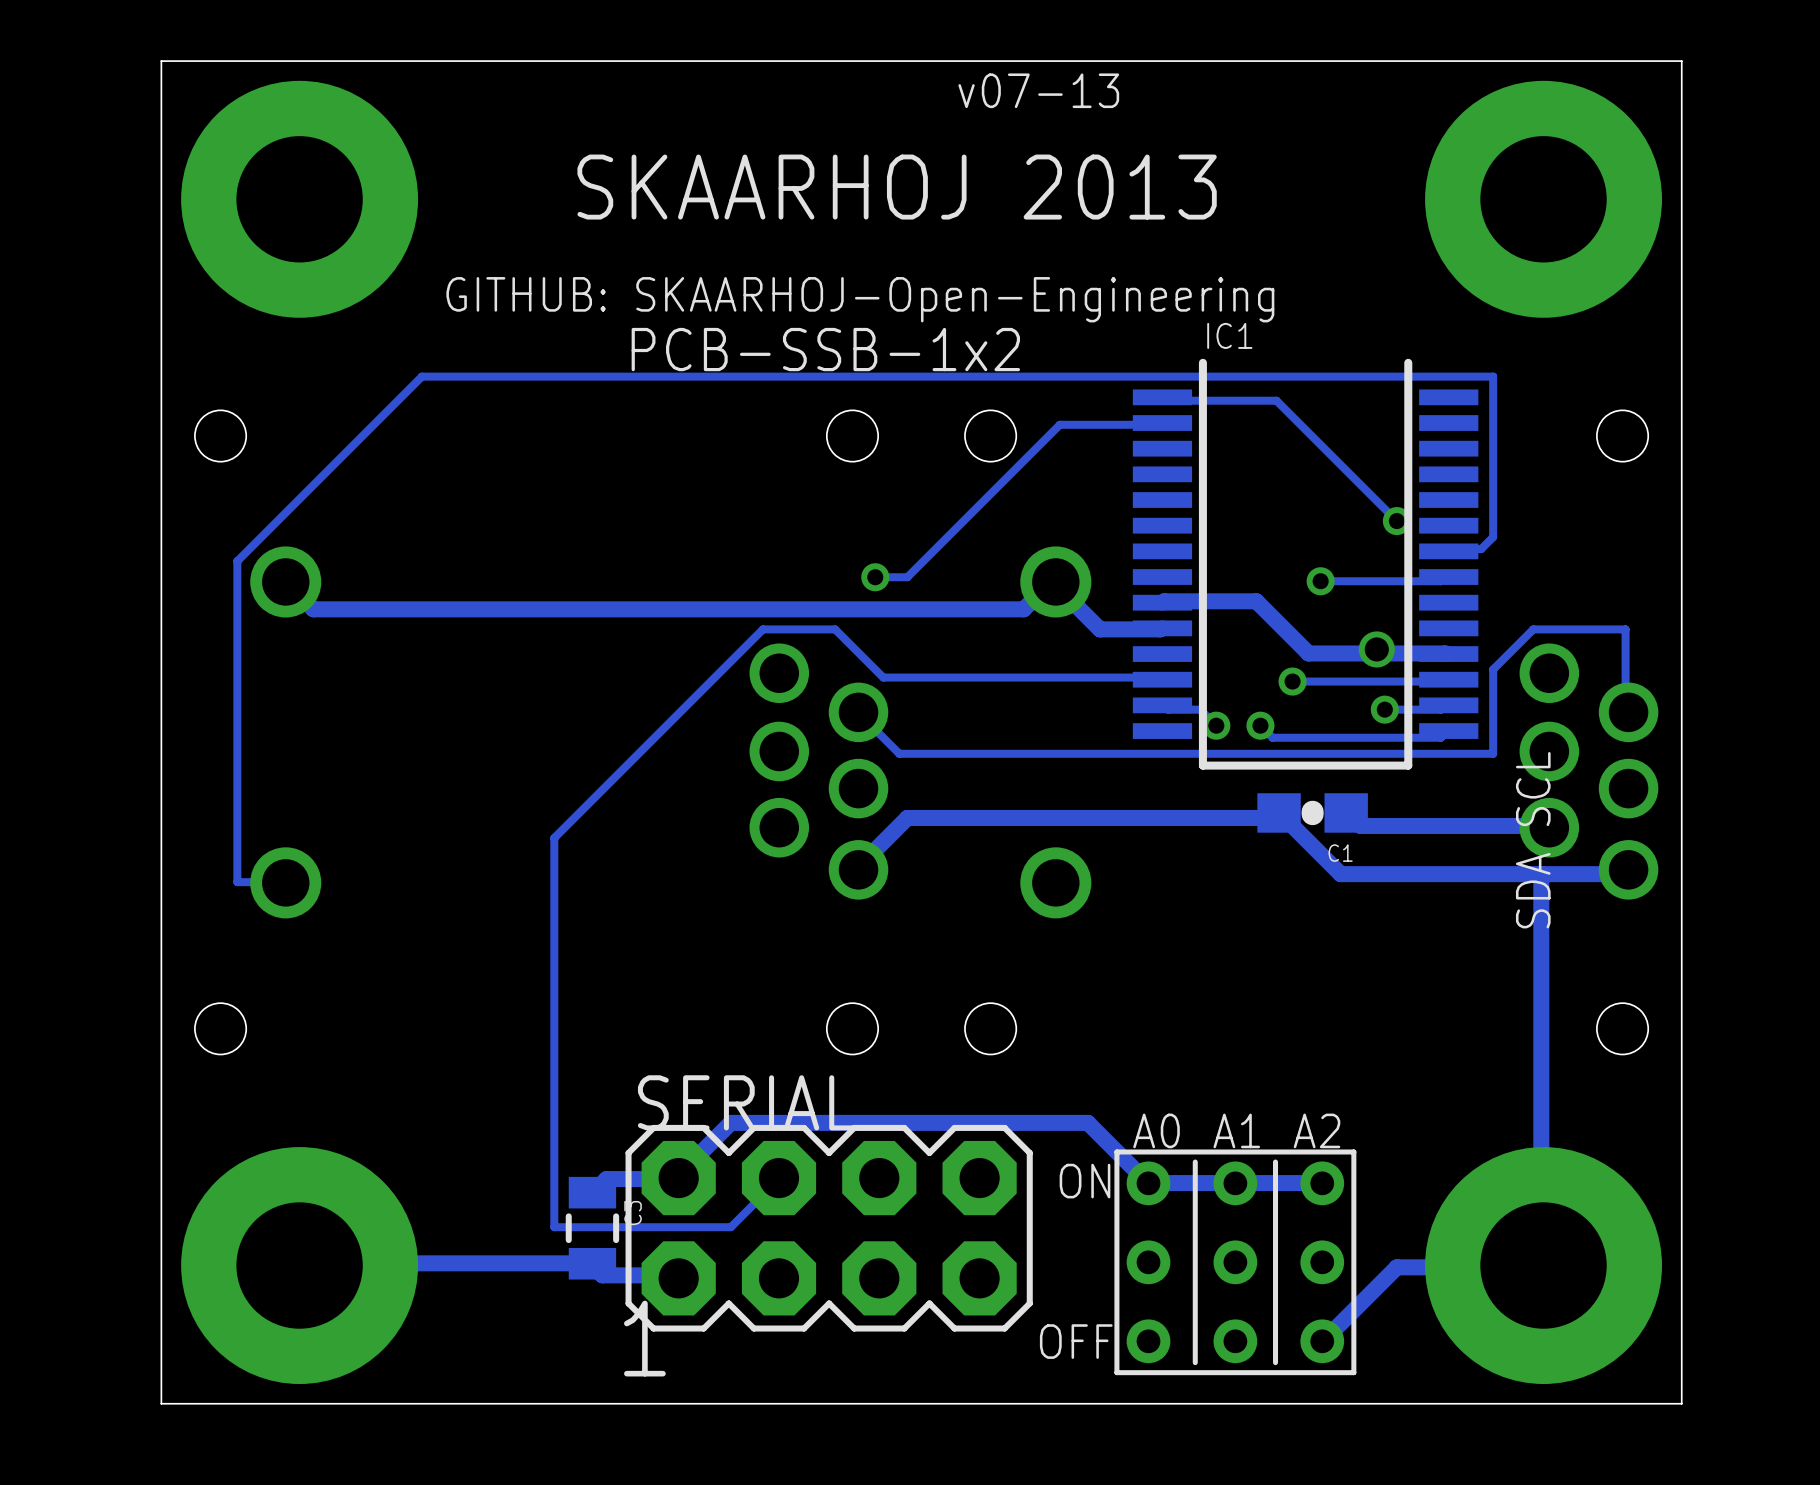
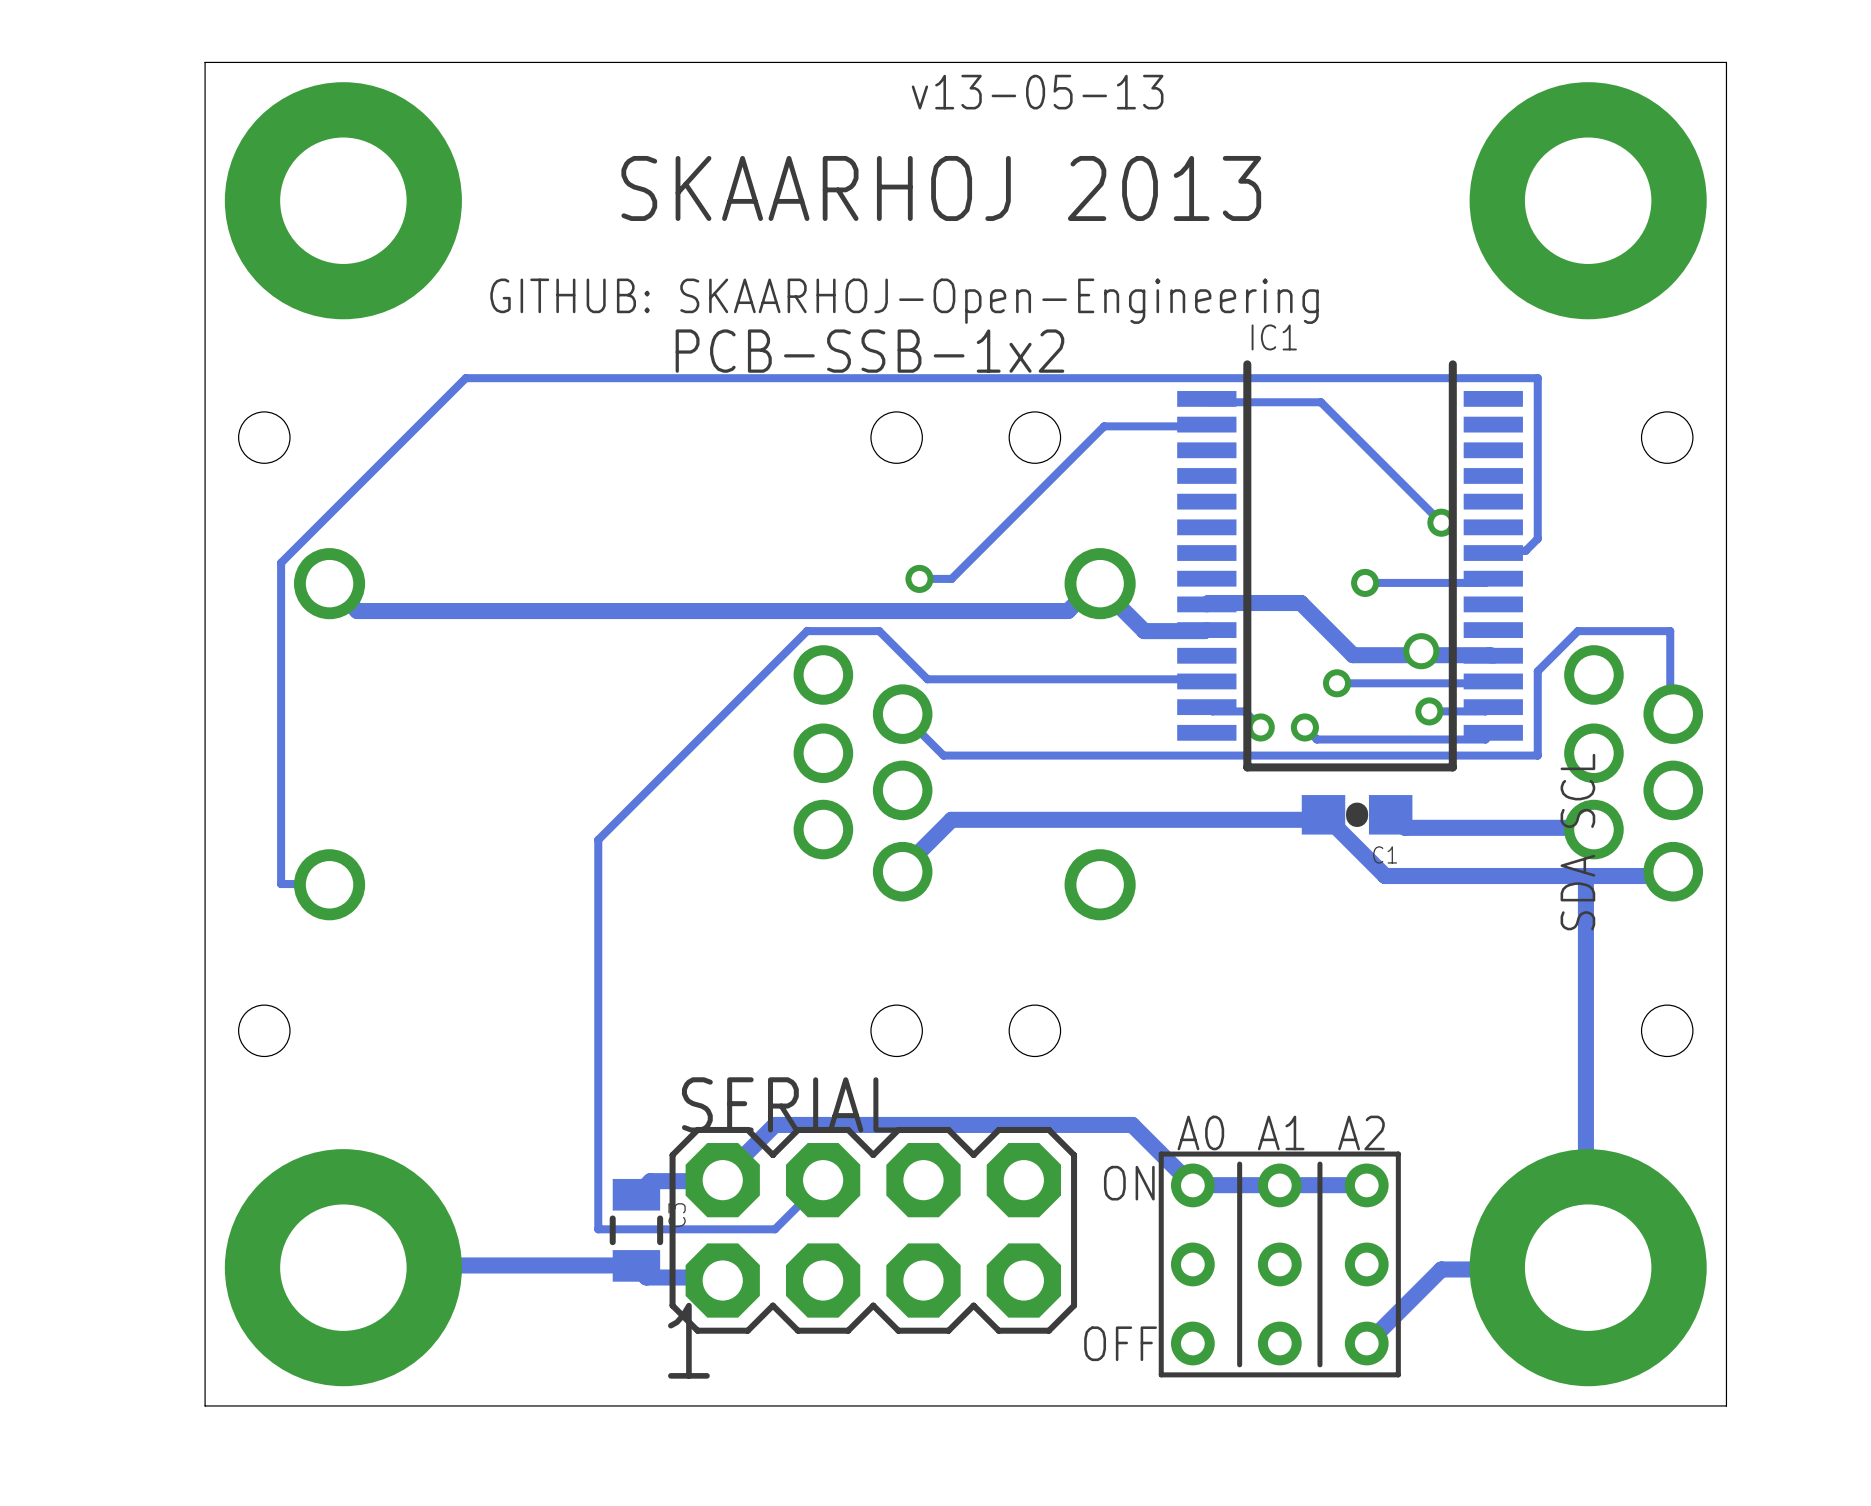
text: v07-13 (1038, 90) -> v13-05-13 (1037, 92)

